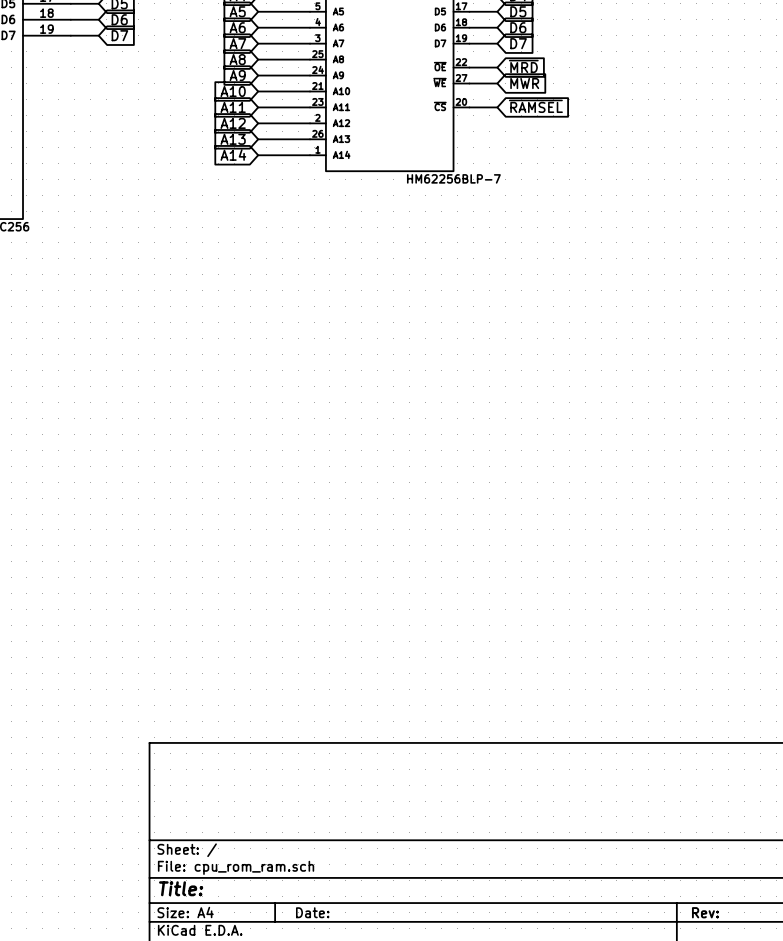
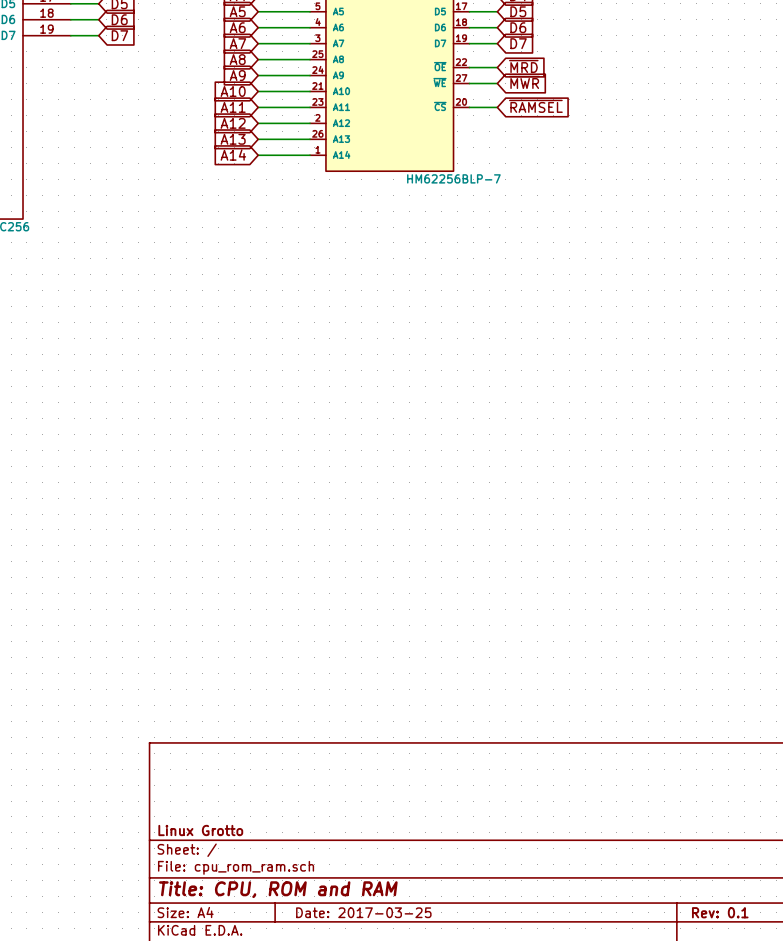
title block: none -> Linux Grotto (200, 830)
title block: Title: (181, 888) -> Title: CPU, ROM and RAM (278, 889)
title block: Date: (312, 912) -> Date: 2017-03-25 (363, 912)
title block: Rev: (705, 912) -> Rev: 0.1 (720, 912)

